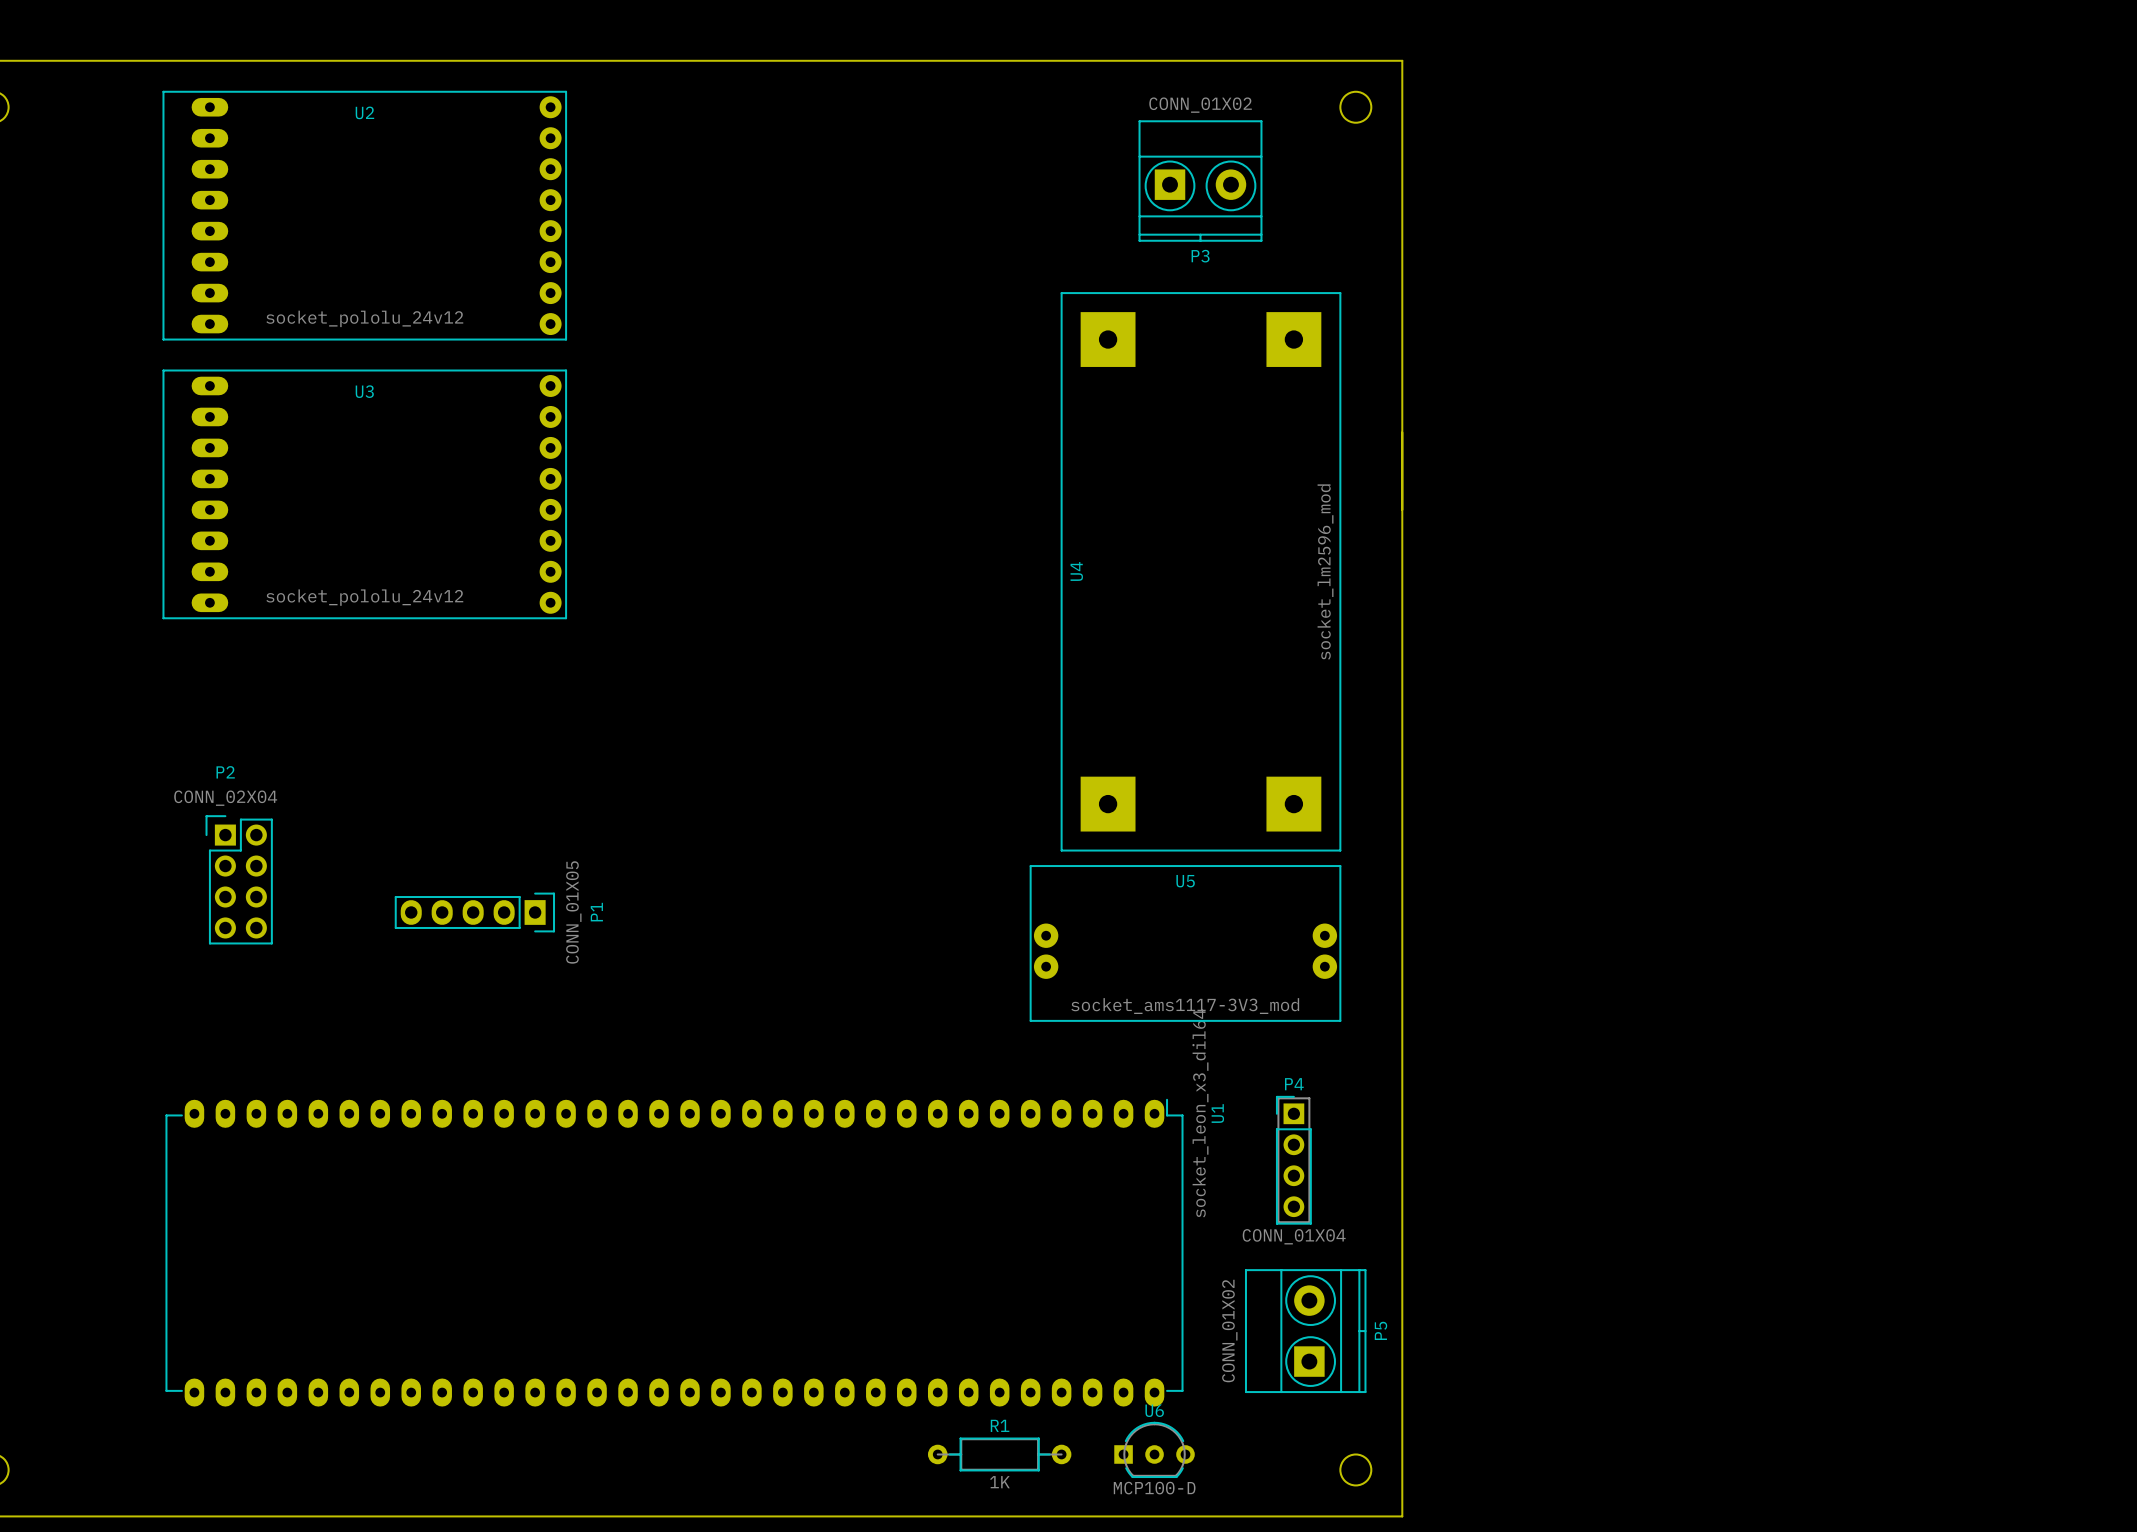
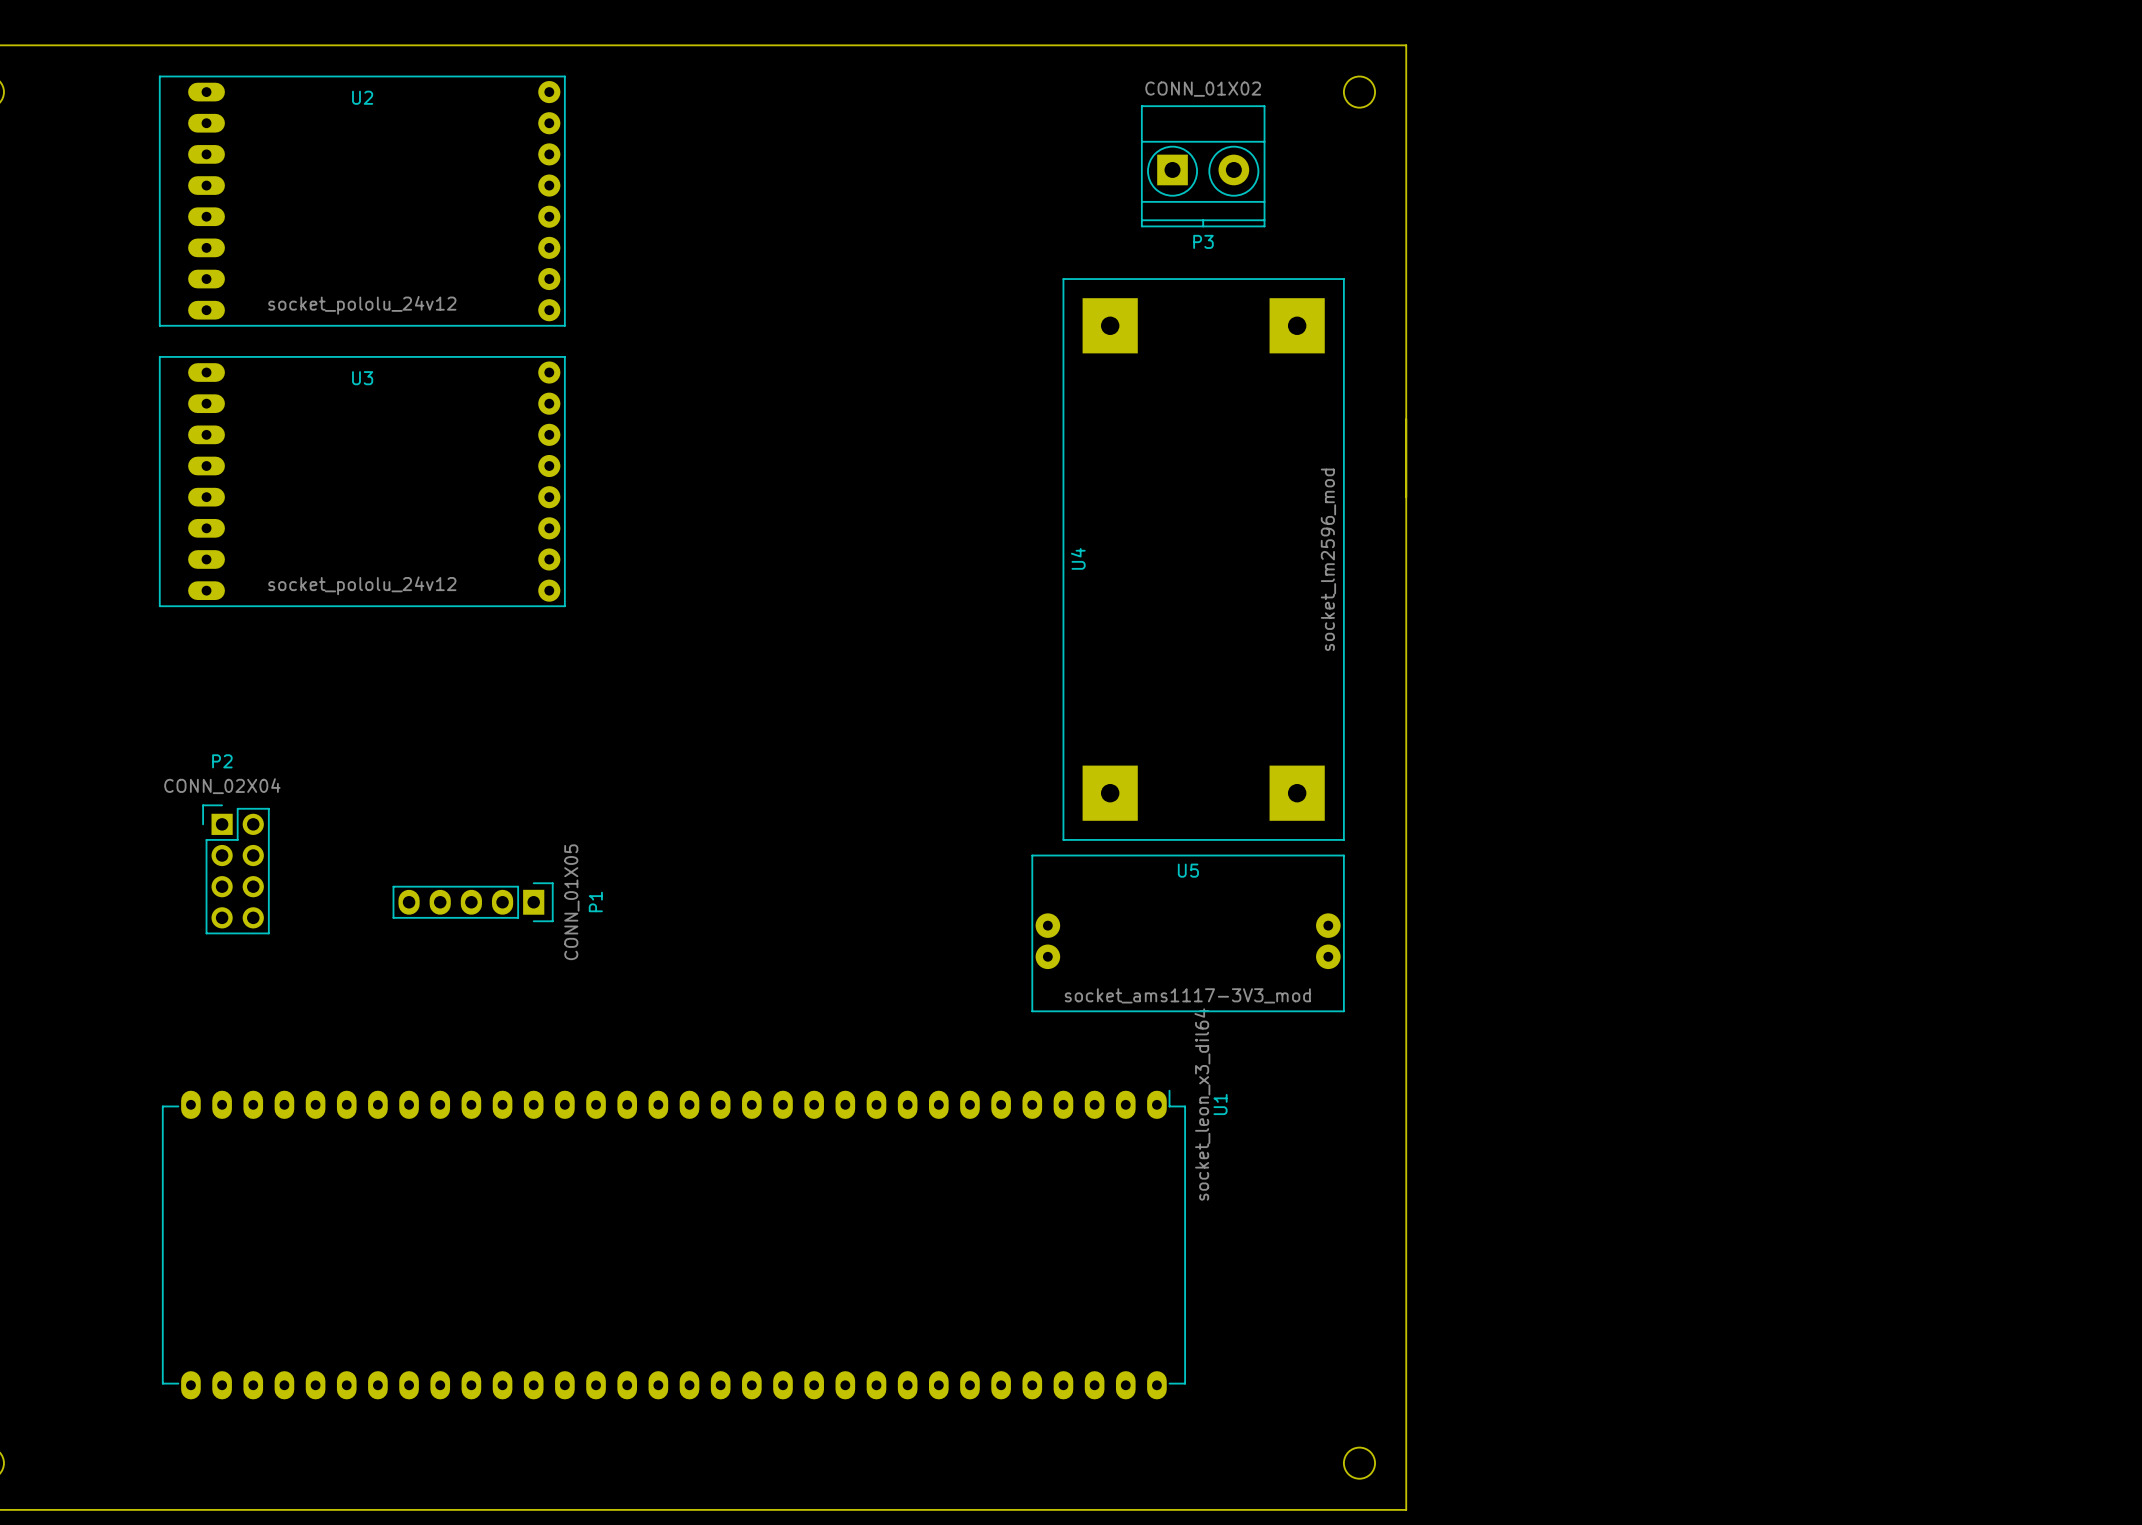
P4: CONN_01X04 (1293, 1160) -> none
P5: CONN_01X02 (1305, 1331) -> none
U6: MCP100-D (1154, 1449) -> none
R1: 1K (999, 1454) -> none

